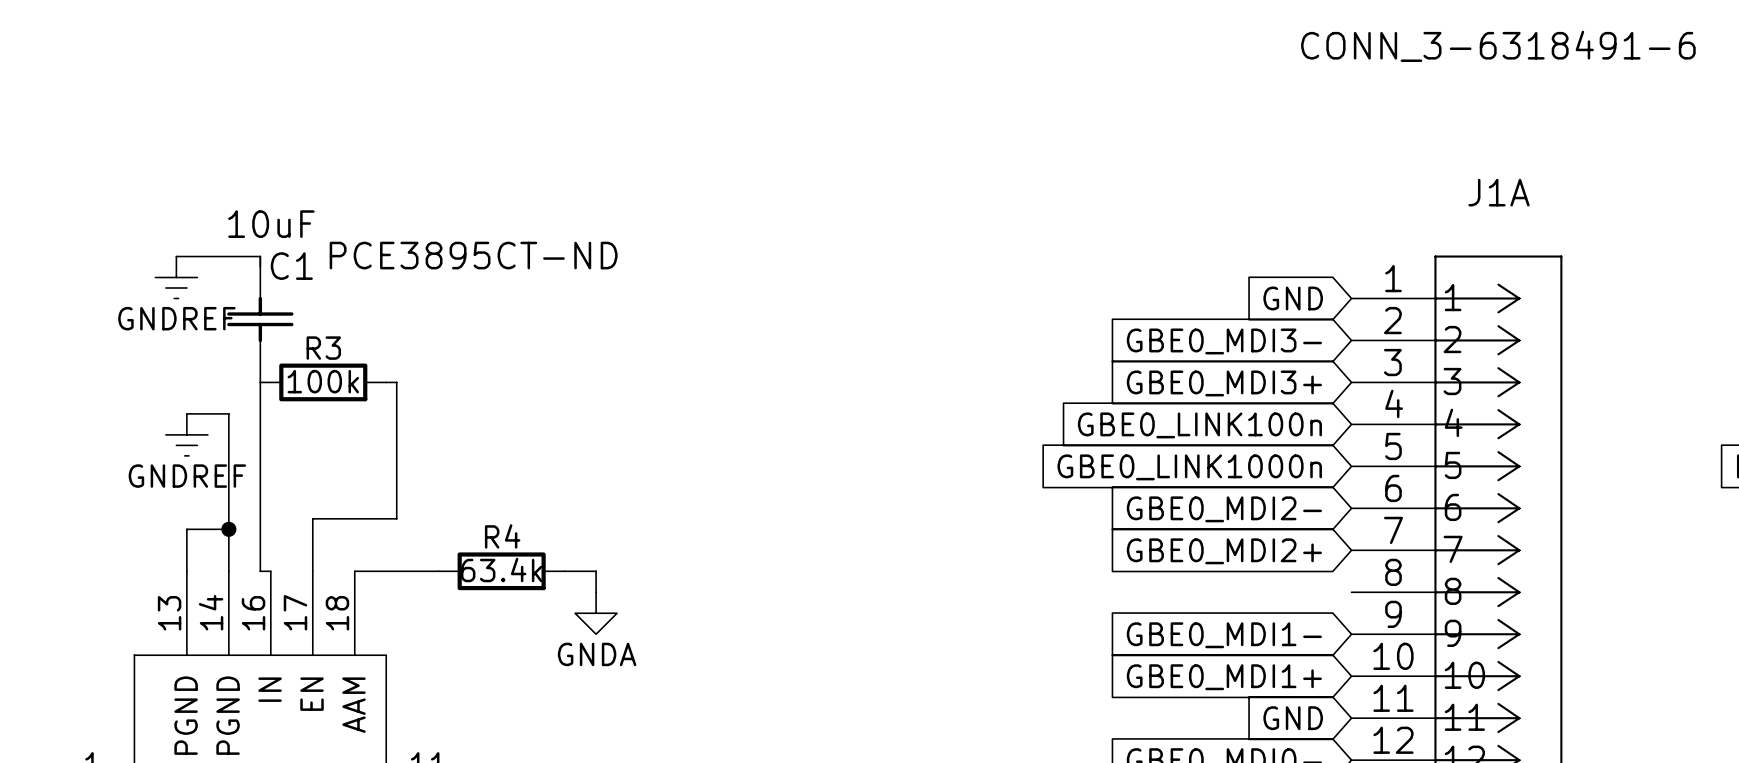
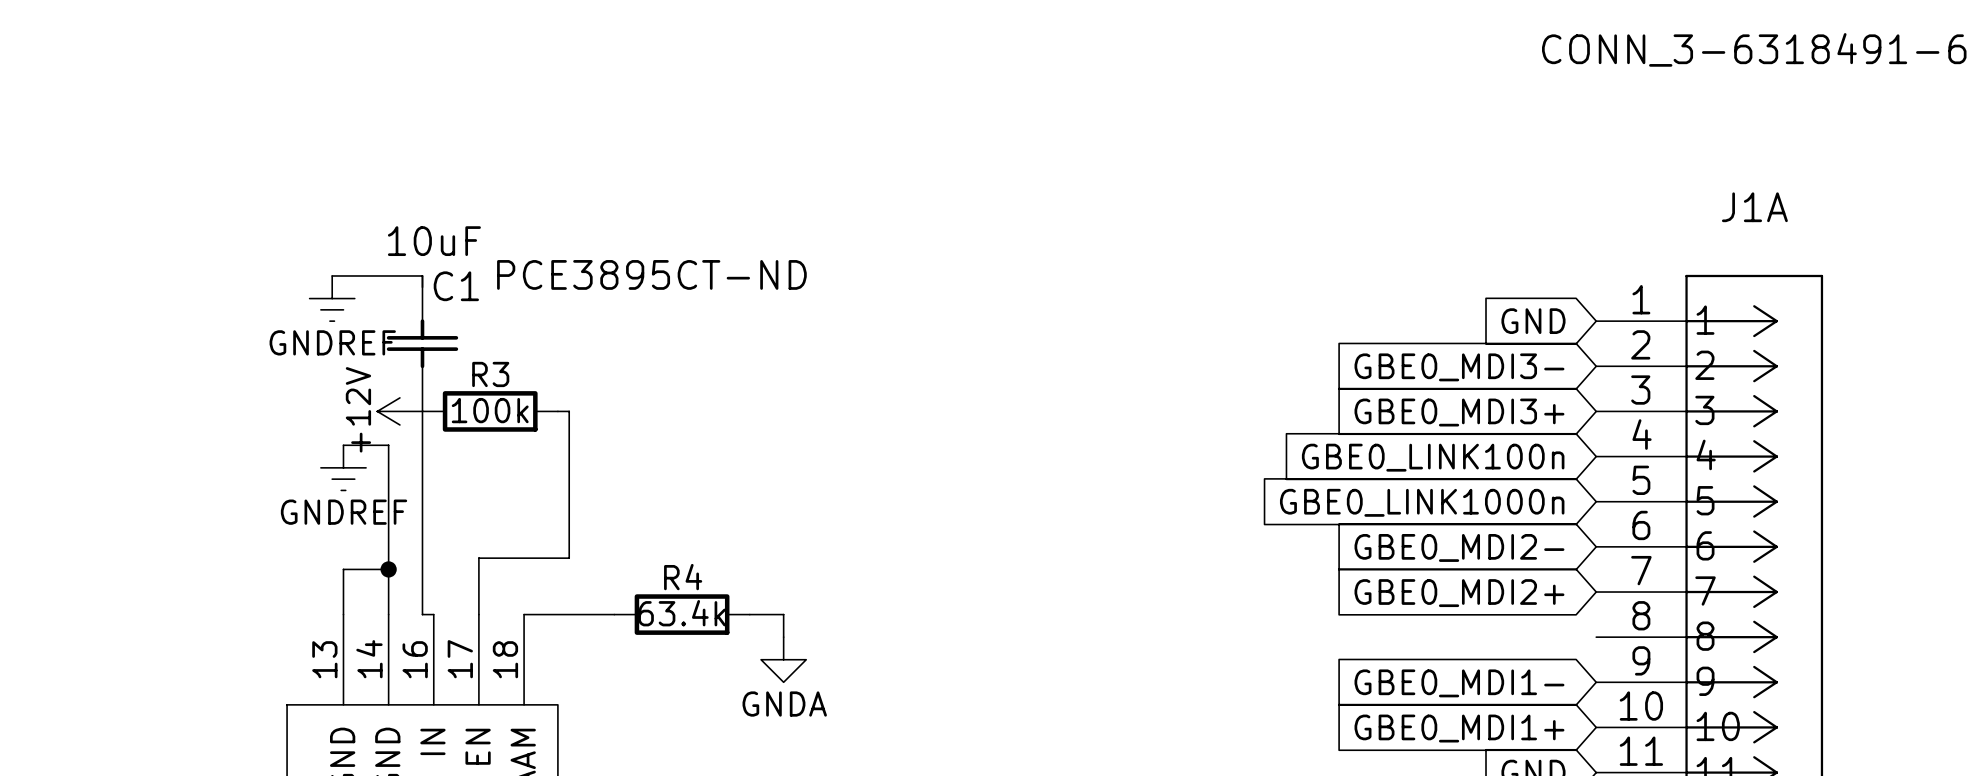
power symbol: none -> +12V (399, 411)

